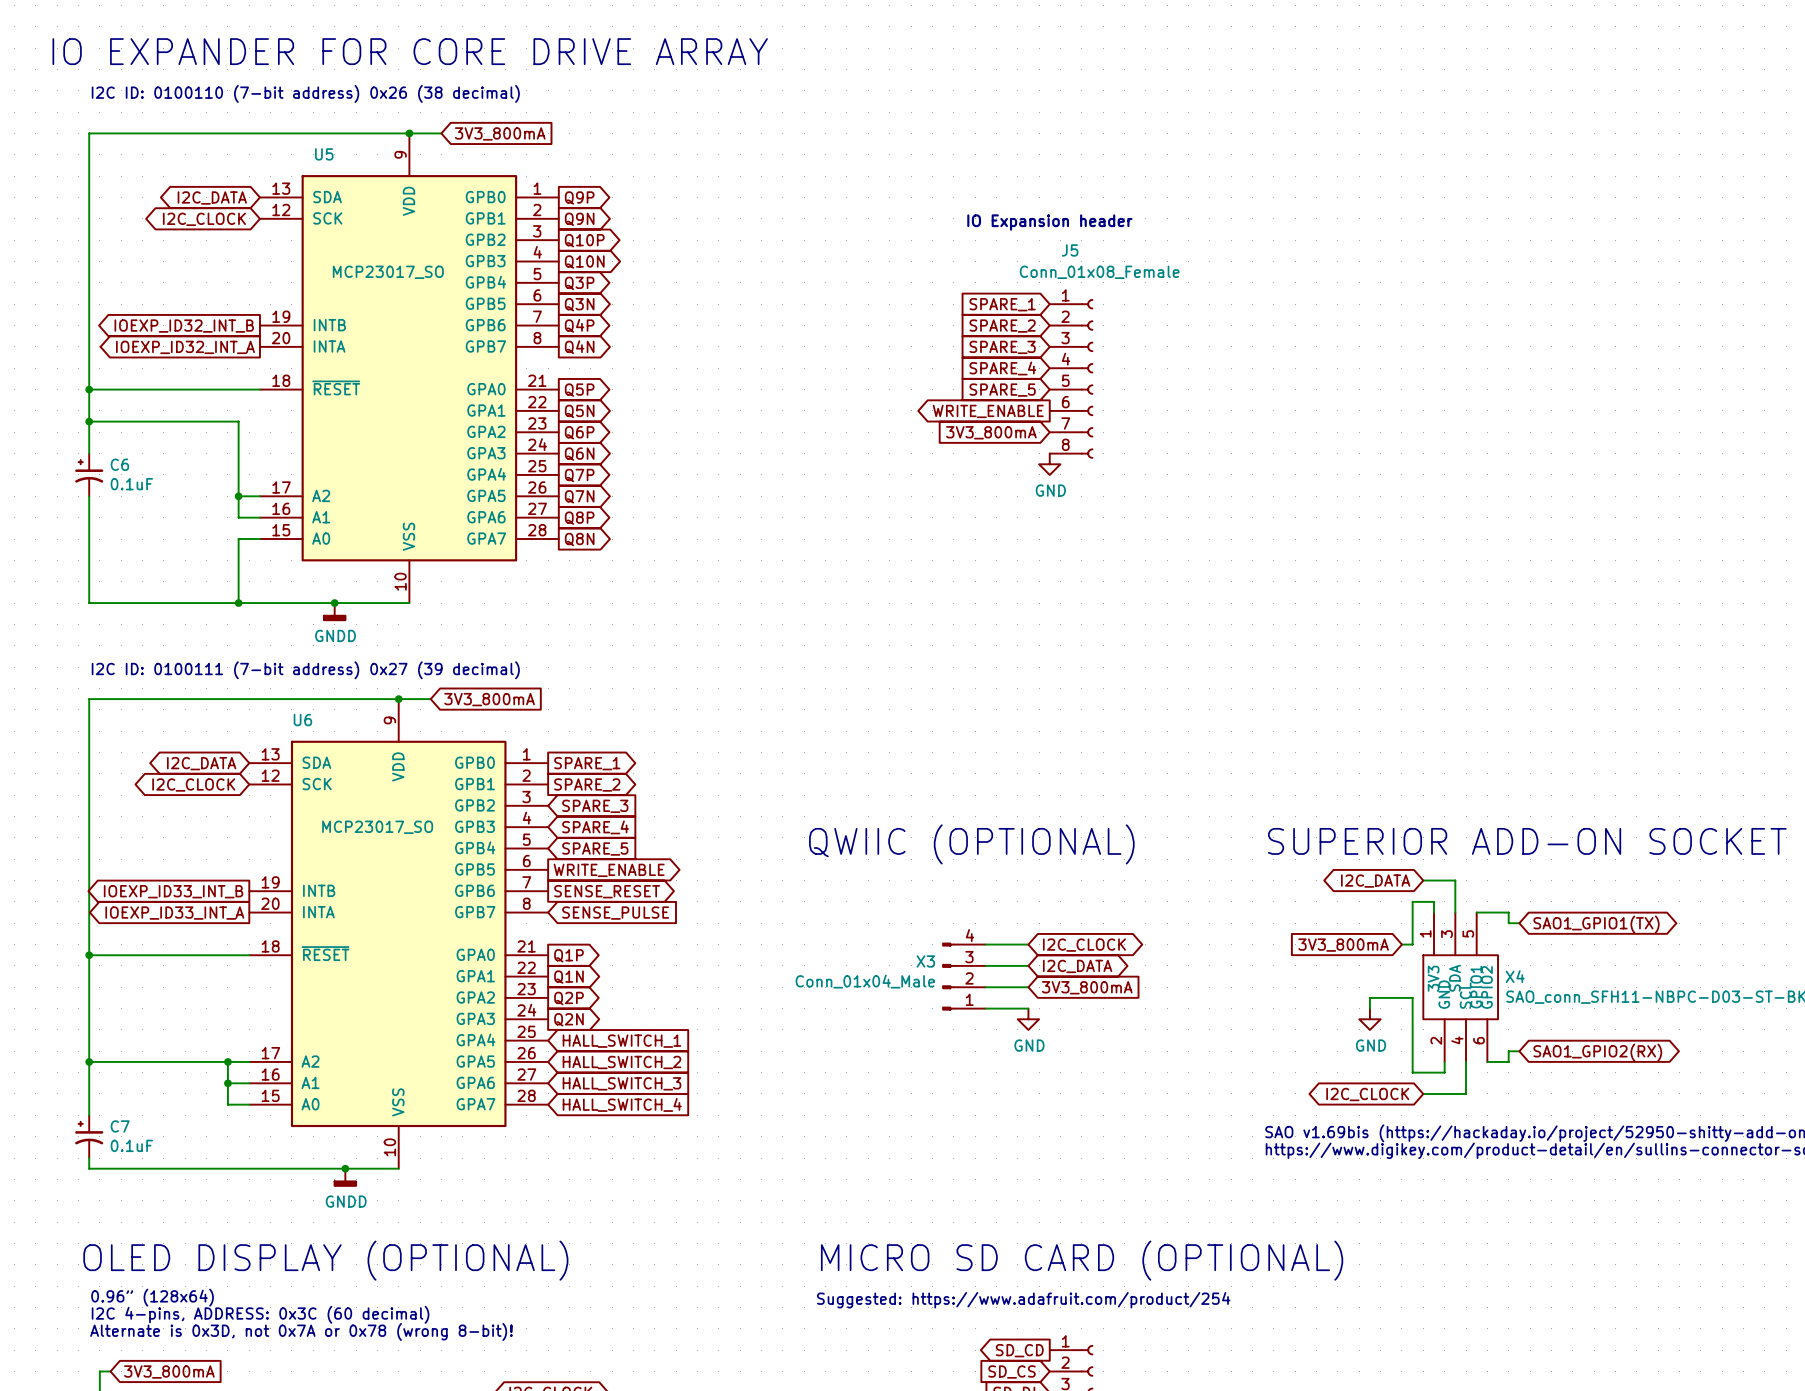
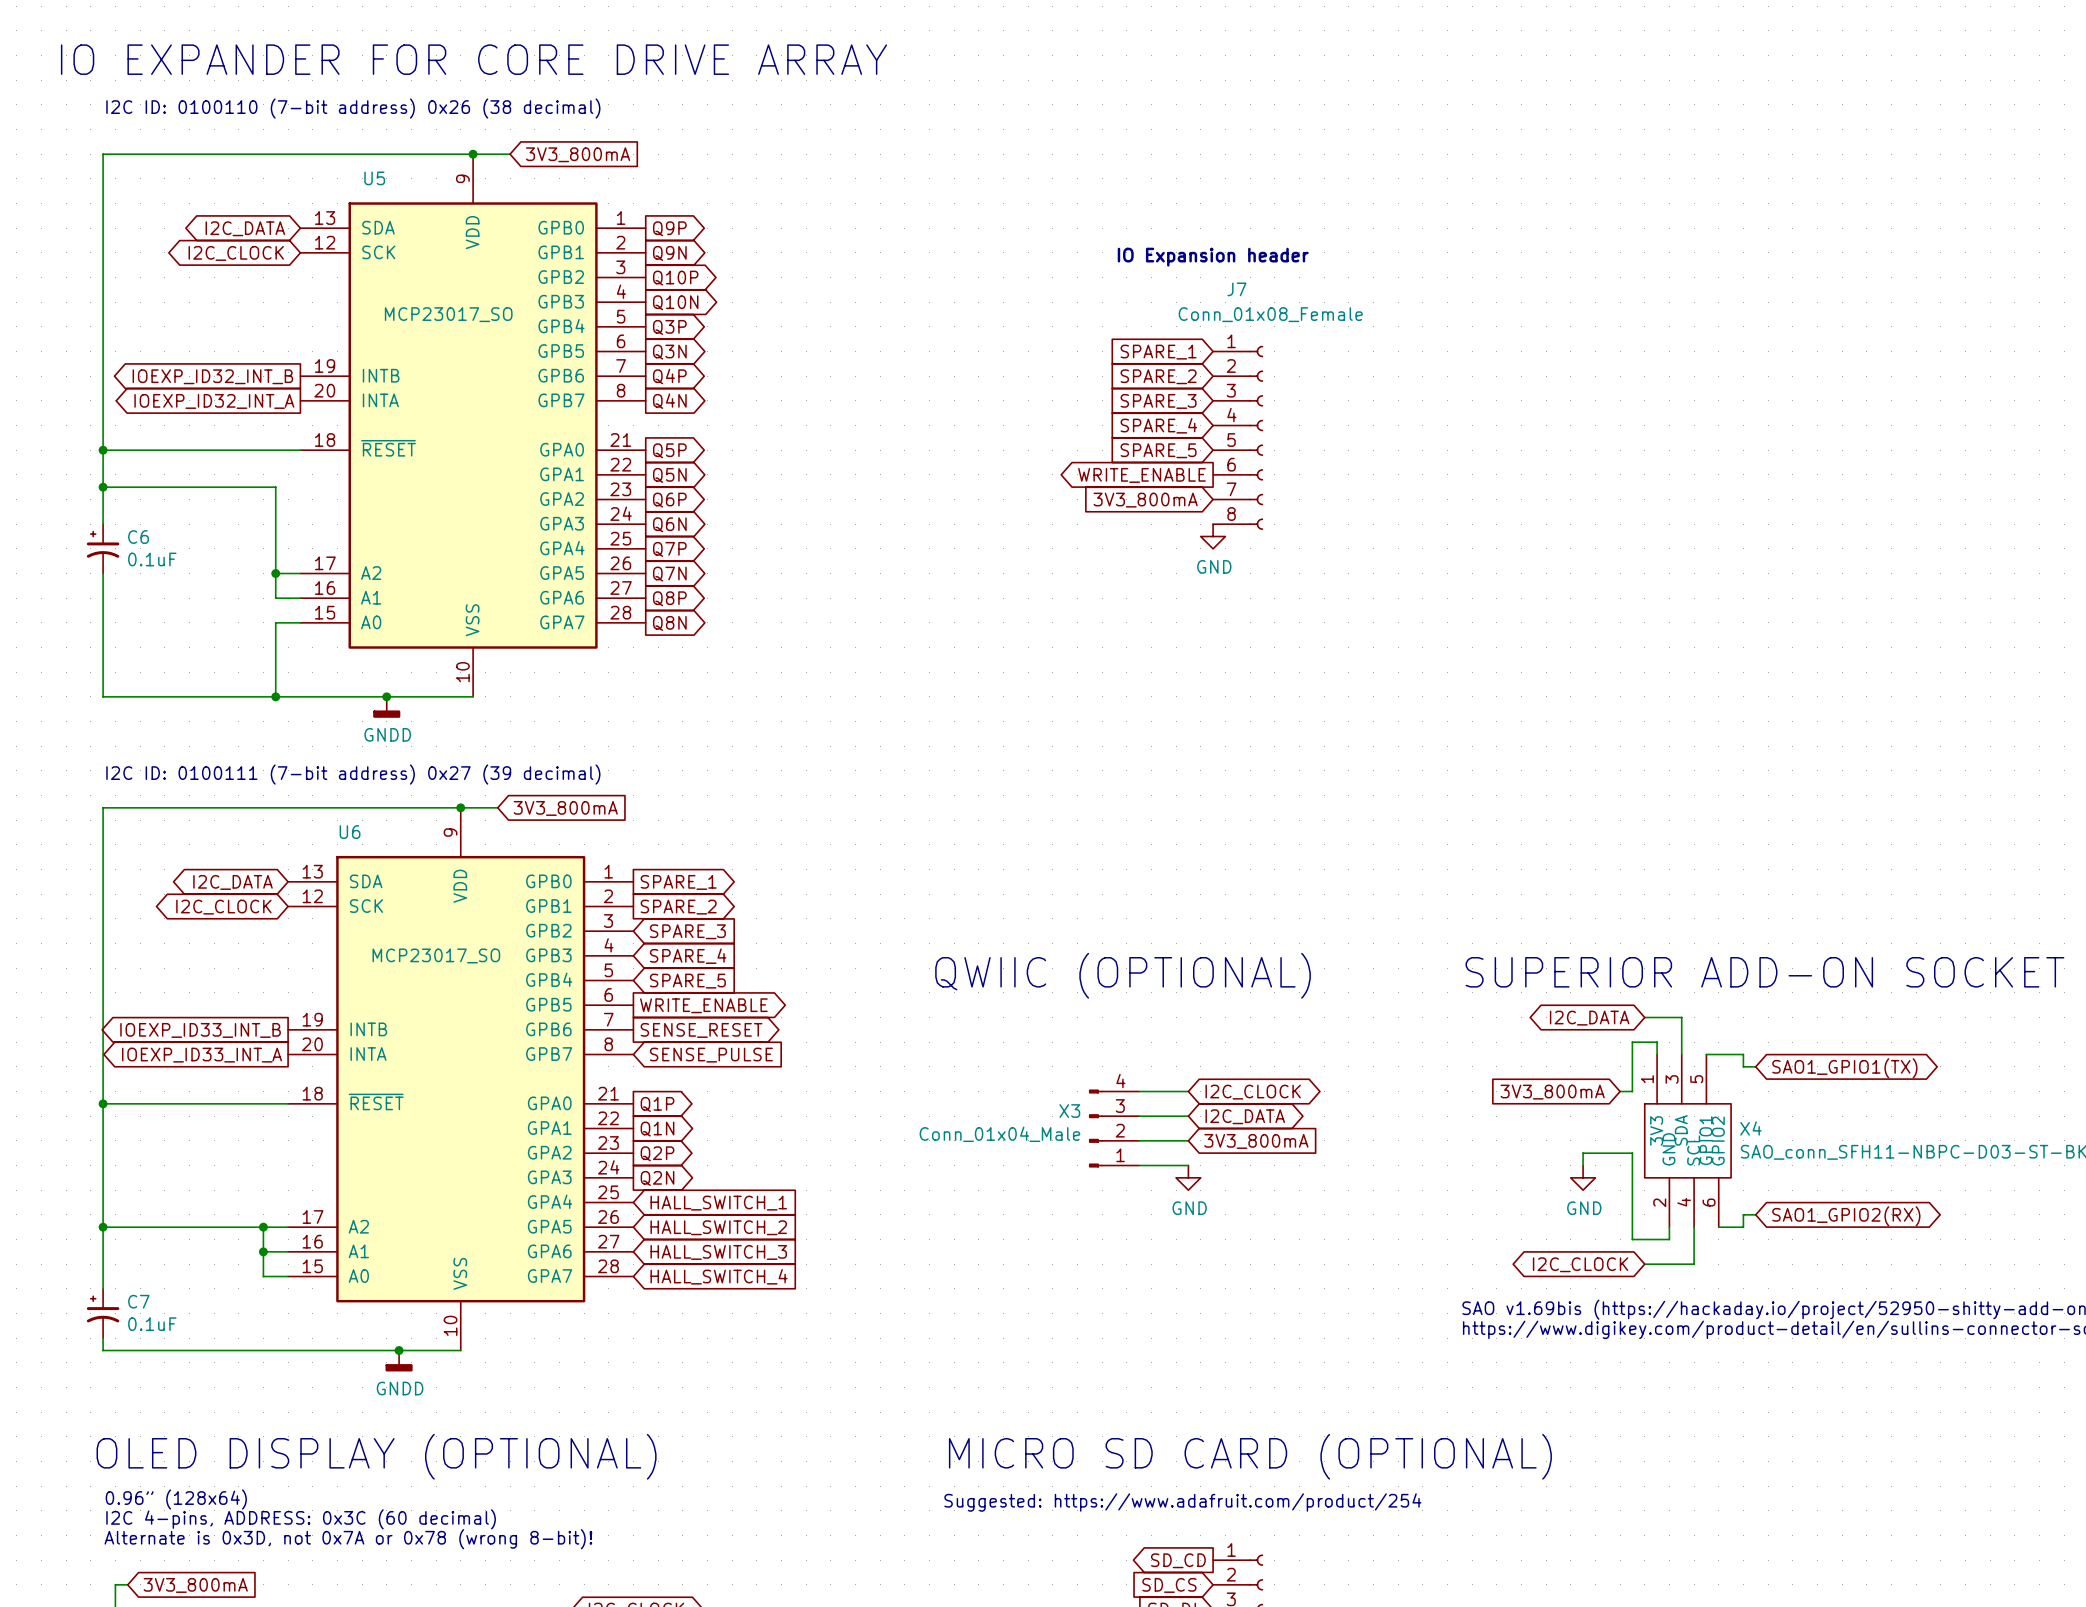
J5 name: J5 (1070, 250) -> J7 (1236, 289)

